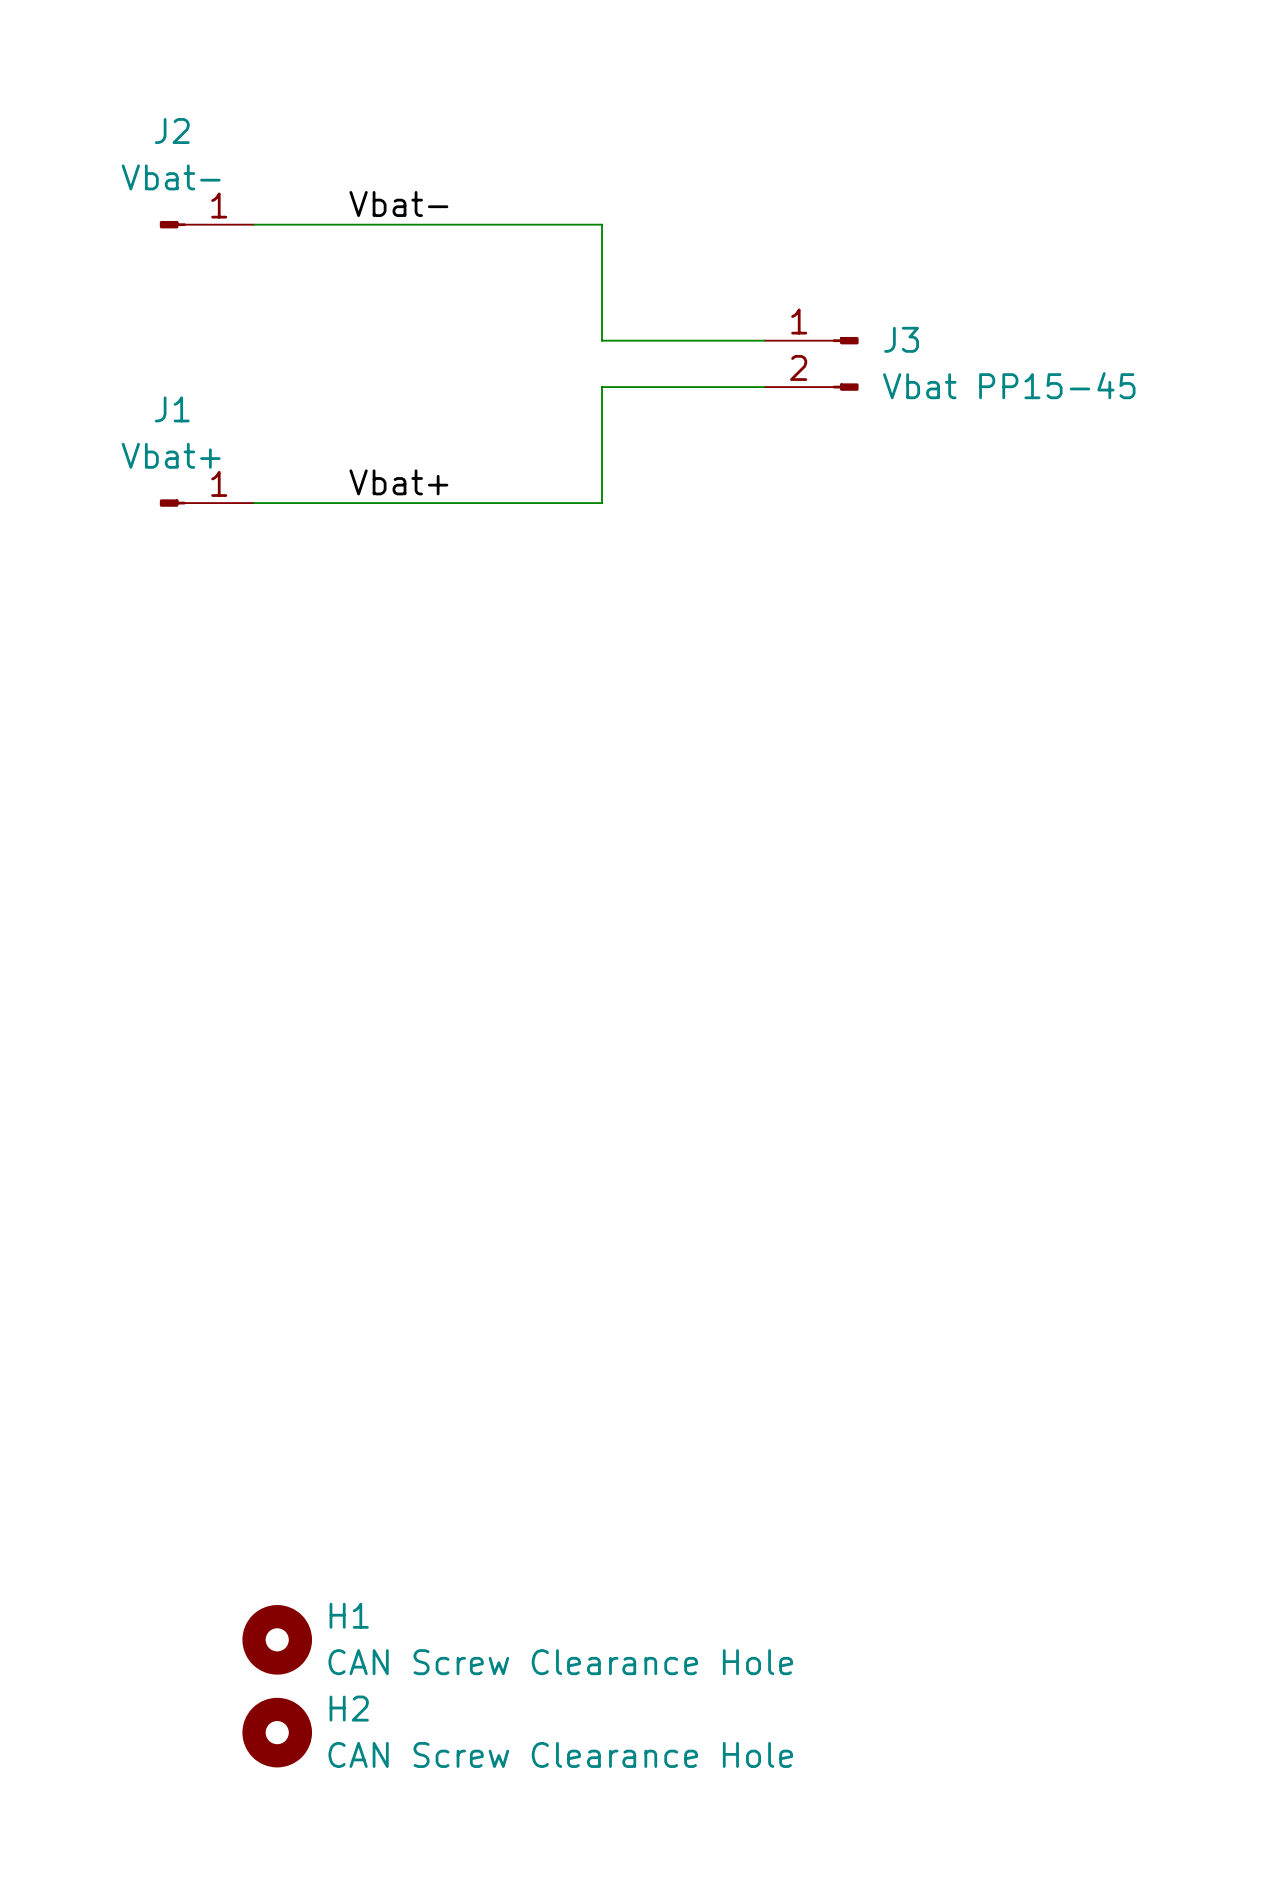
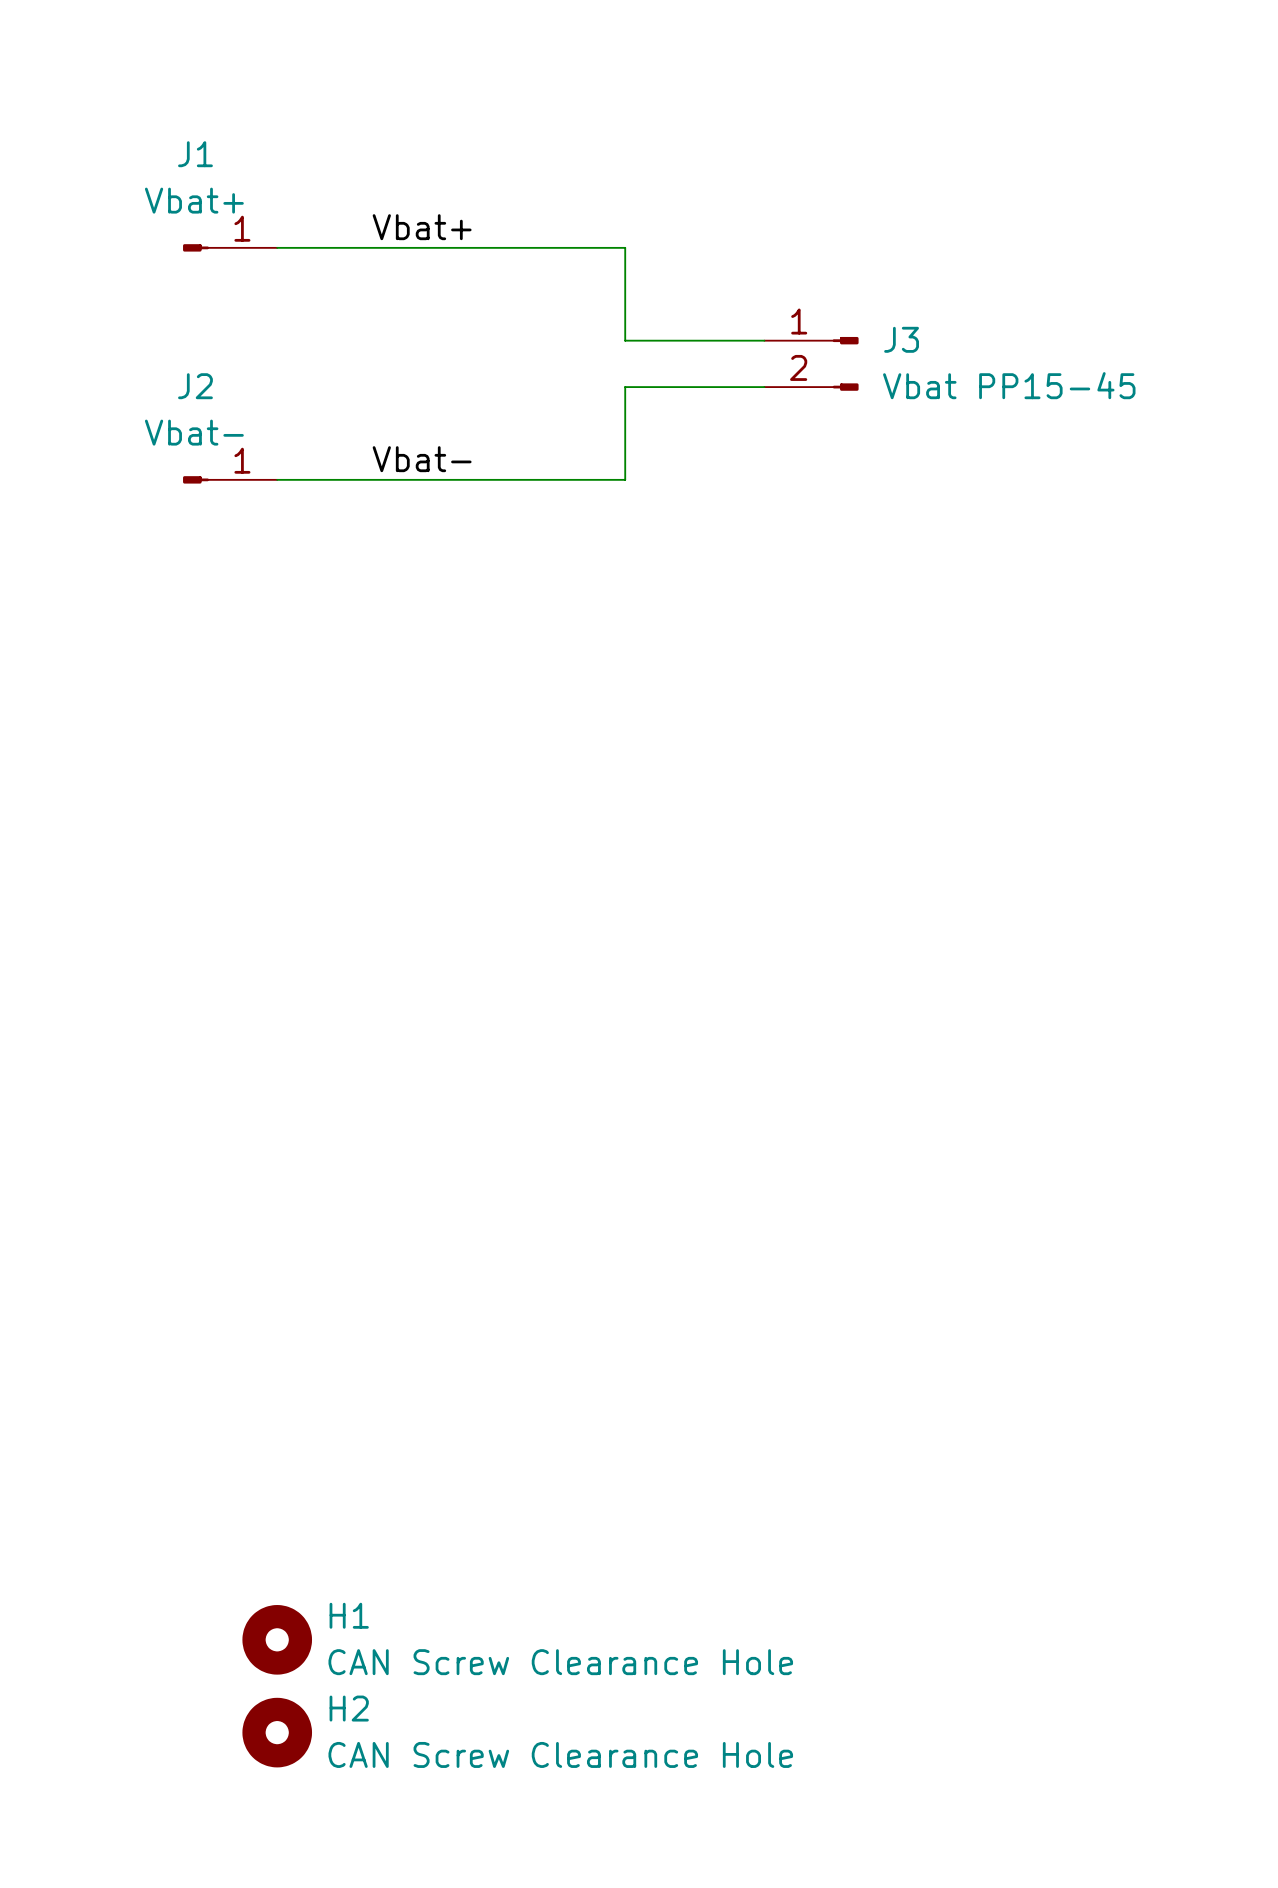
label position: Vbat- (398, 203) -> Vbat- (422, 459)
J2 position: (206, 224) -> (230, 479)
wire: (254, 224) (602, 224) (602, 340) (625, 340) -> (277, 247) (625, 247) (625, 340)
wire: (625, 387) (602, 387) (602, 503) (254, 503) -> (625, 387) (625, 479) (277, 479)
label position: Vbat+ (398, 482) -> Vbat+ (422, 227)
J1 position: (206, 503) -> (230, 247)

